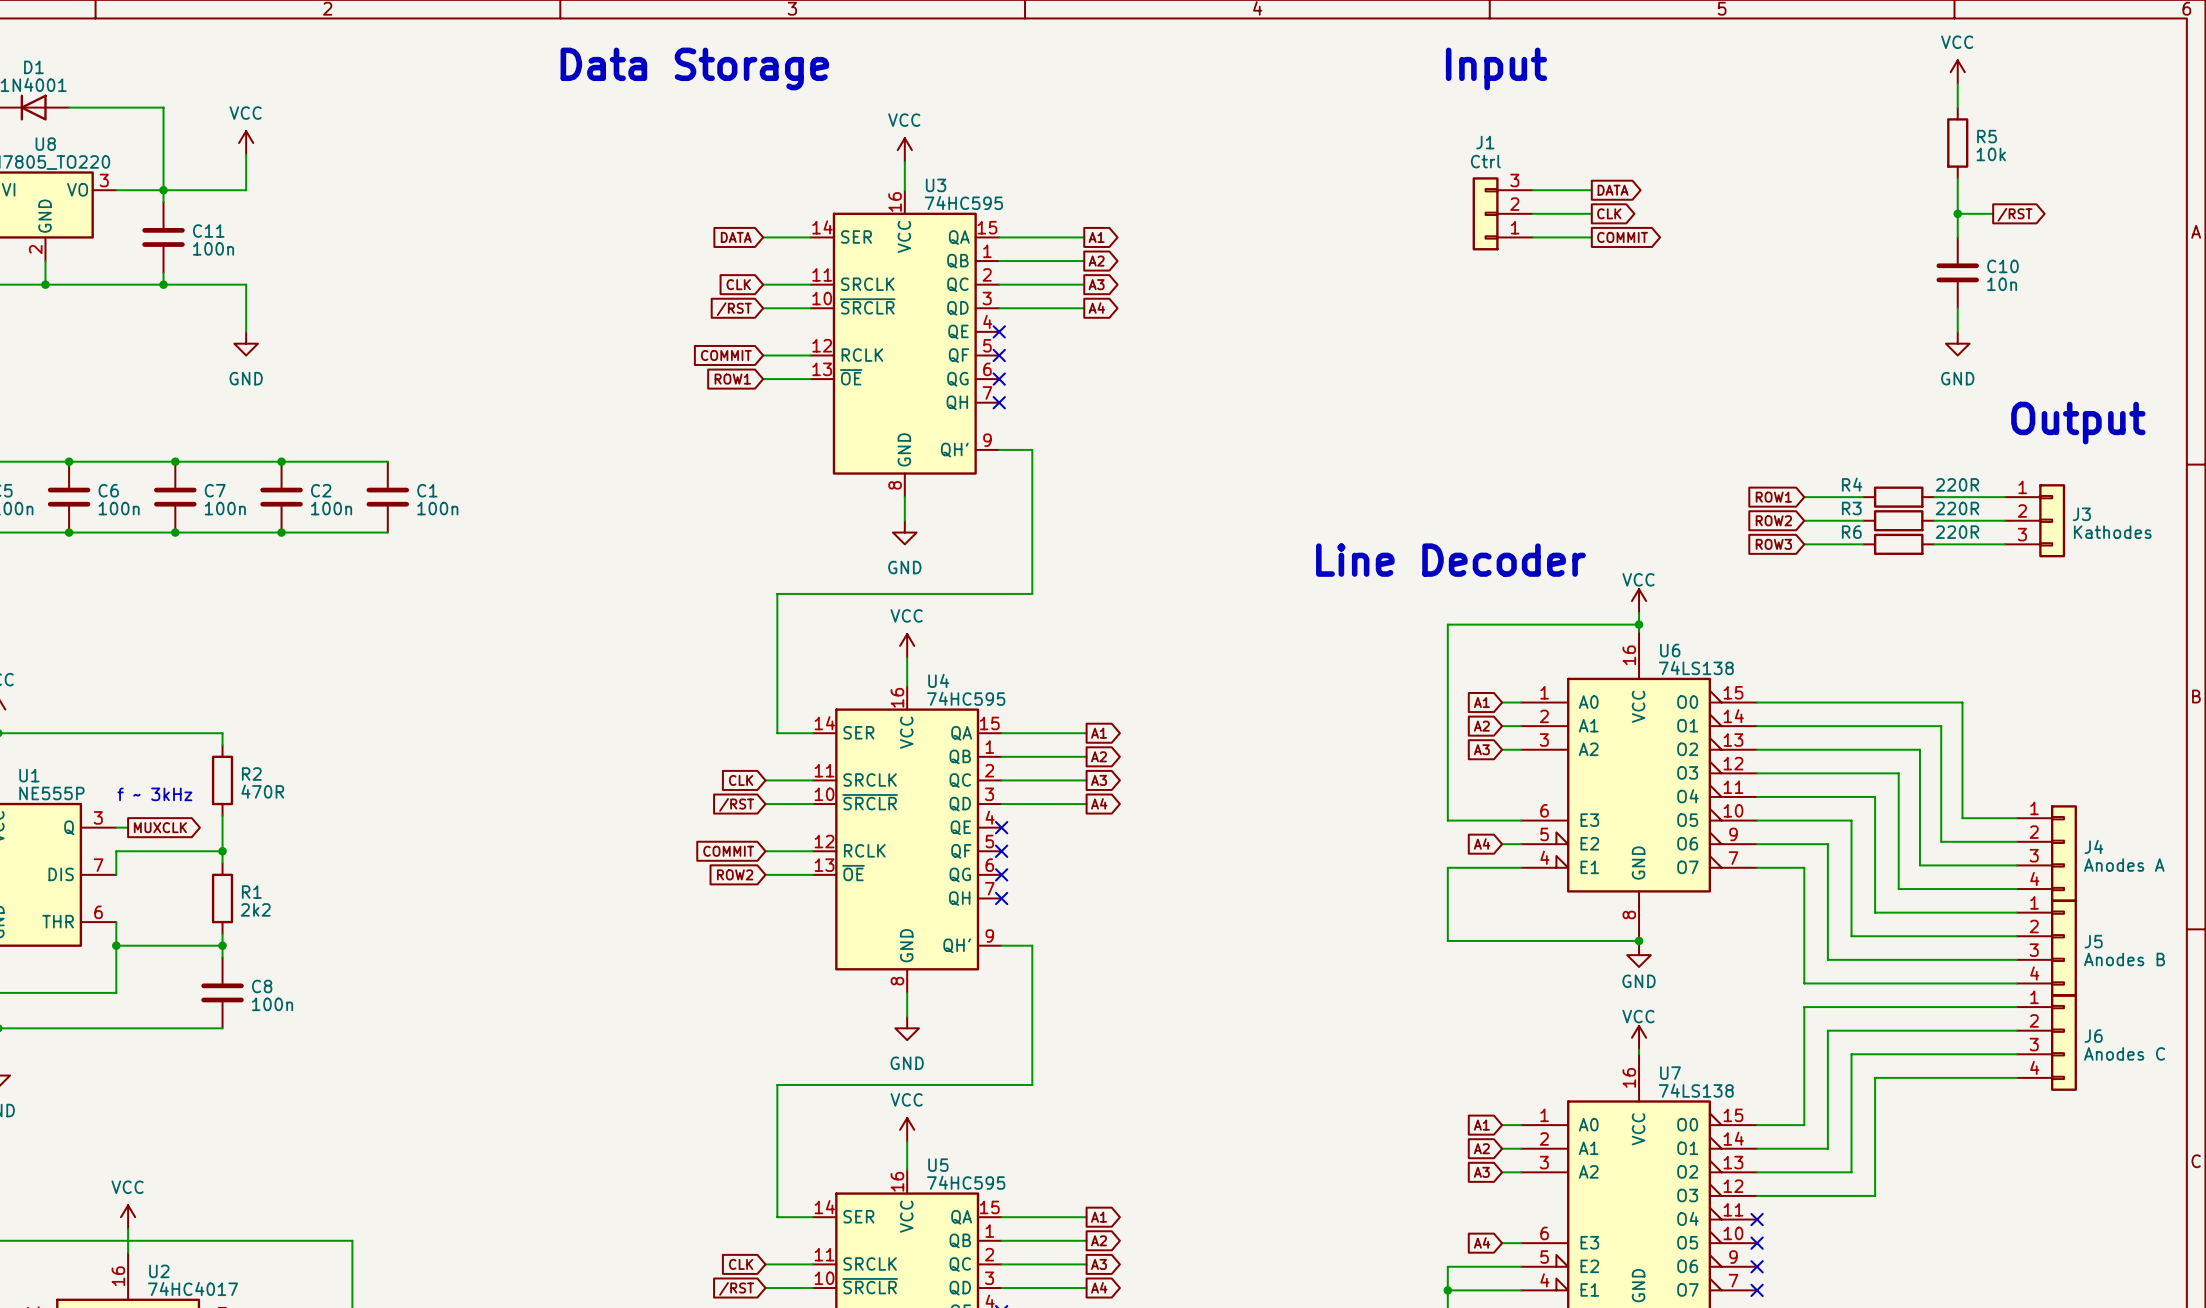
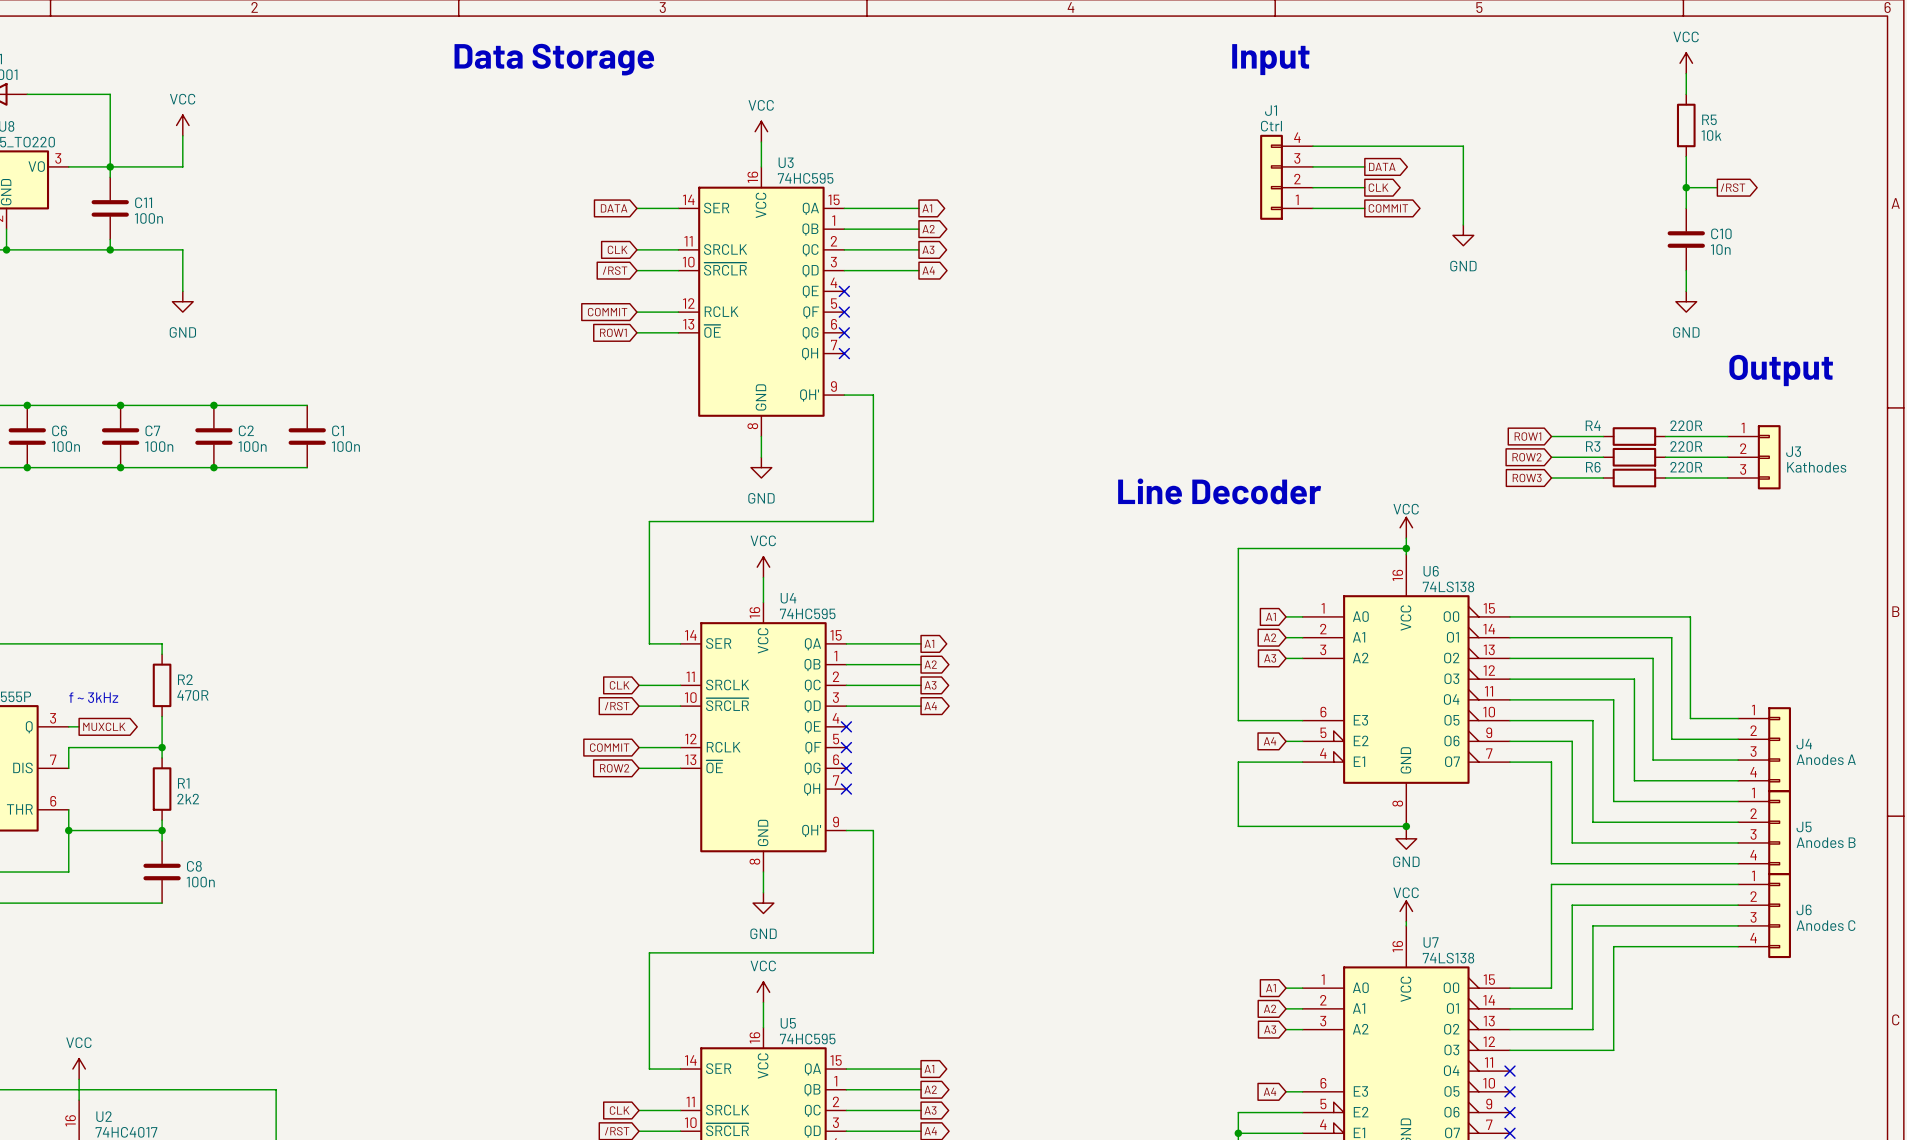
wire: none -> (1312, 146) (1463, 146) (1463, 225)
J1 symbol: [1472, 177, 1533, 251] -> [1260, 134, 1313, 220]
power symbol: none -> GND (1463, 235)

